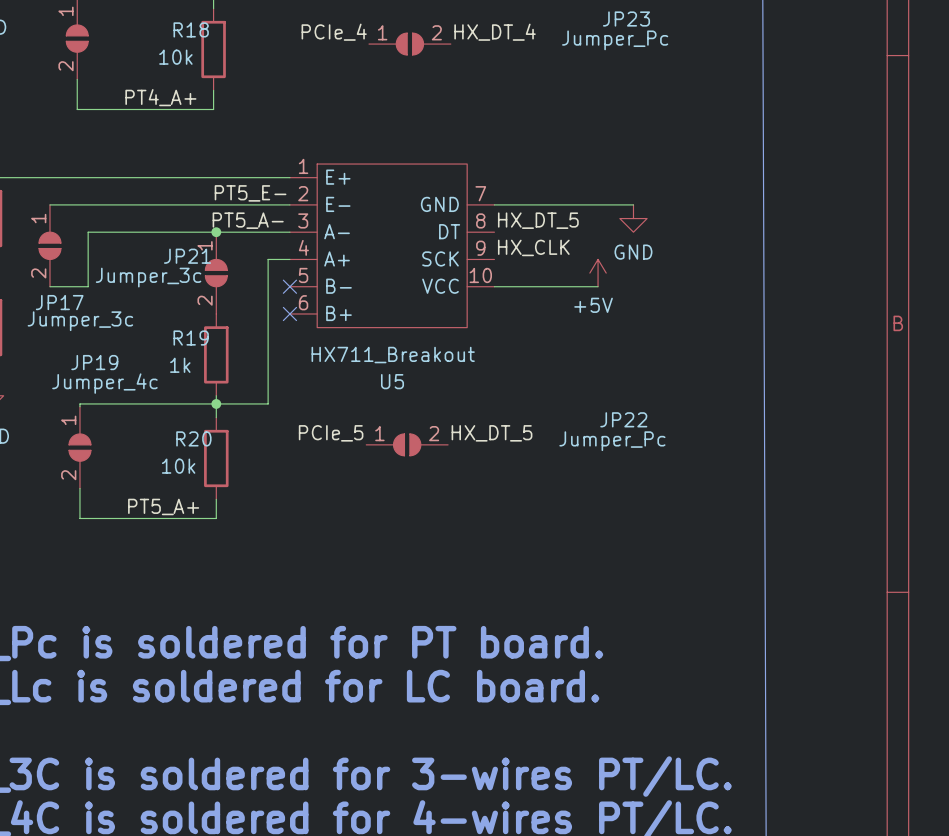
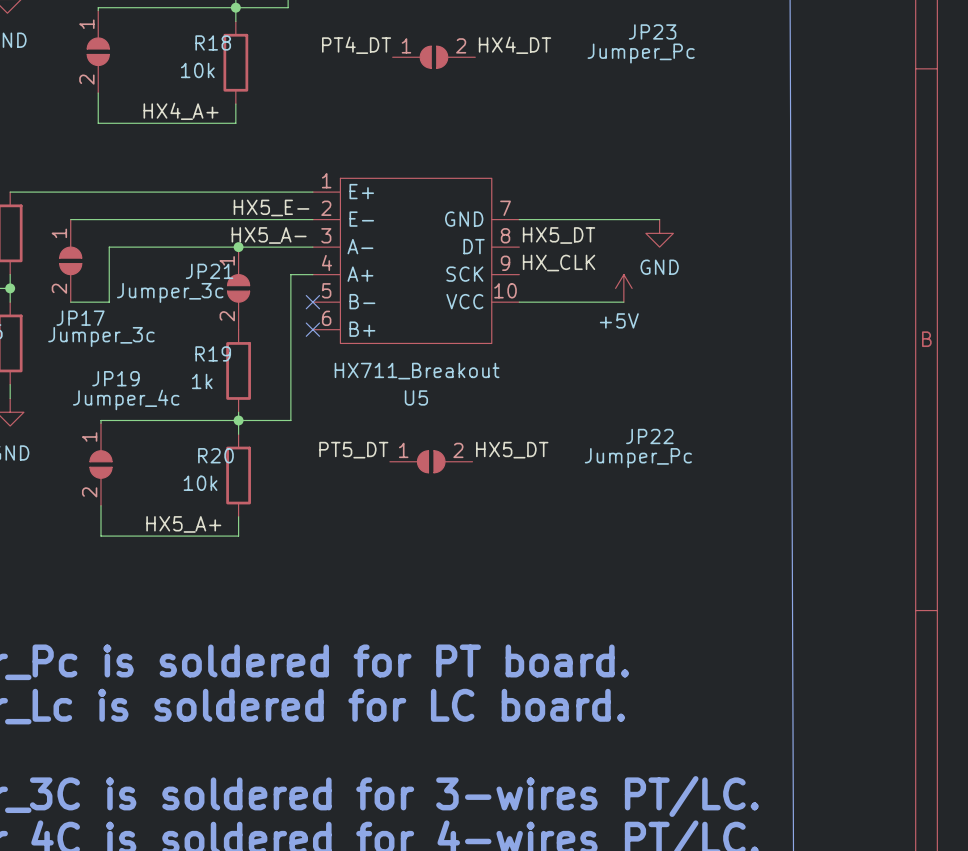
label: PCIe_4 (334, 32) -> PT4_DT (356, 45)
label: HX_DT_4 (495, 32) -> HX4_DT (515, 45)
label: PT4_A+ (160, 97) -> HX4_A+ (181, 111)
label: PT5_E- (250, 193) -> HX5_E- (271, 207)
label: PT5_A- (248, 220) -> HX5_A- (269, 235)
label: HX_DT_5 (538, 220) -> HX5_DT (559, 235)
label: PCIe_5 (331, 433) -> PT5_DT (353, 450)
label: HX_DT_5 (491, 433) -> HX5_DT (512, 450)
label: PT5_A+ (163, 506) -> HX5_A+ (183, 524)

